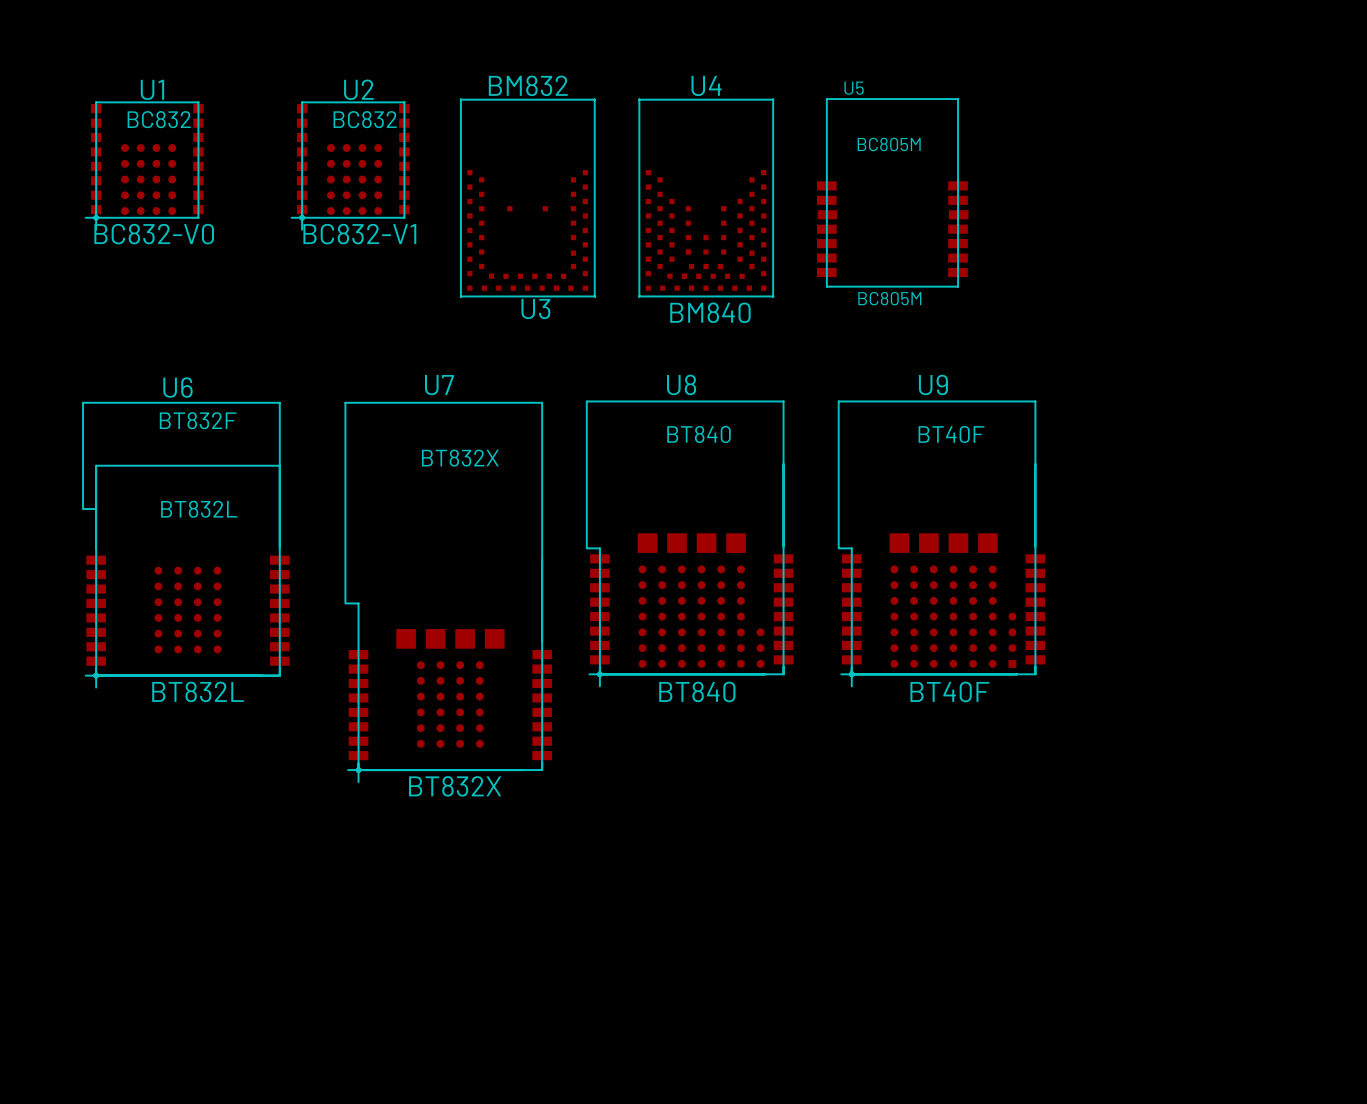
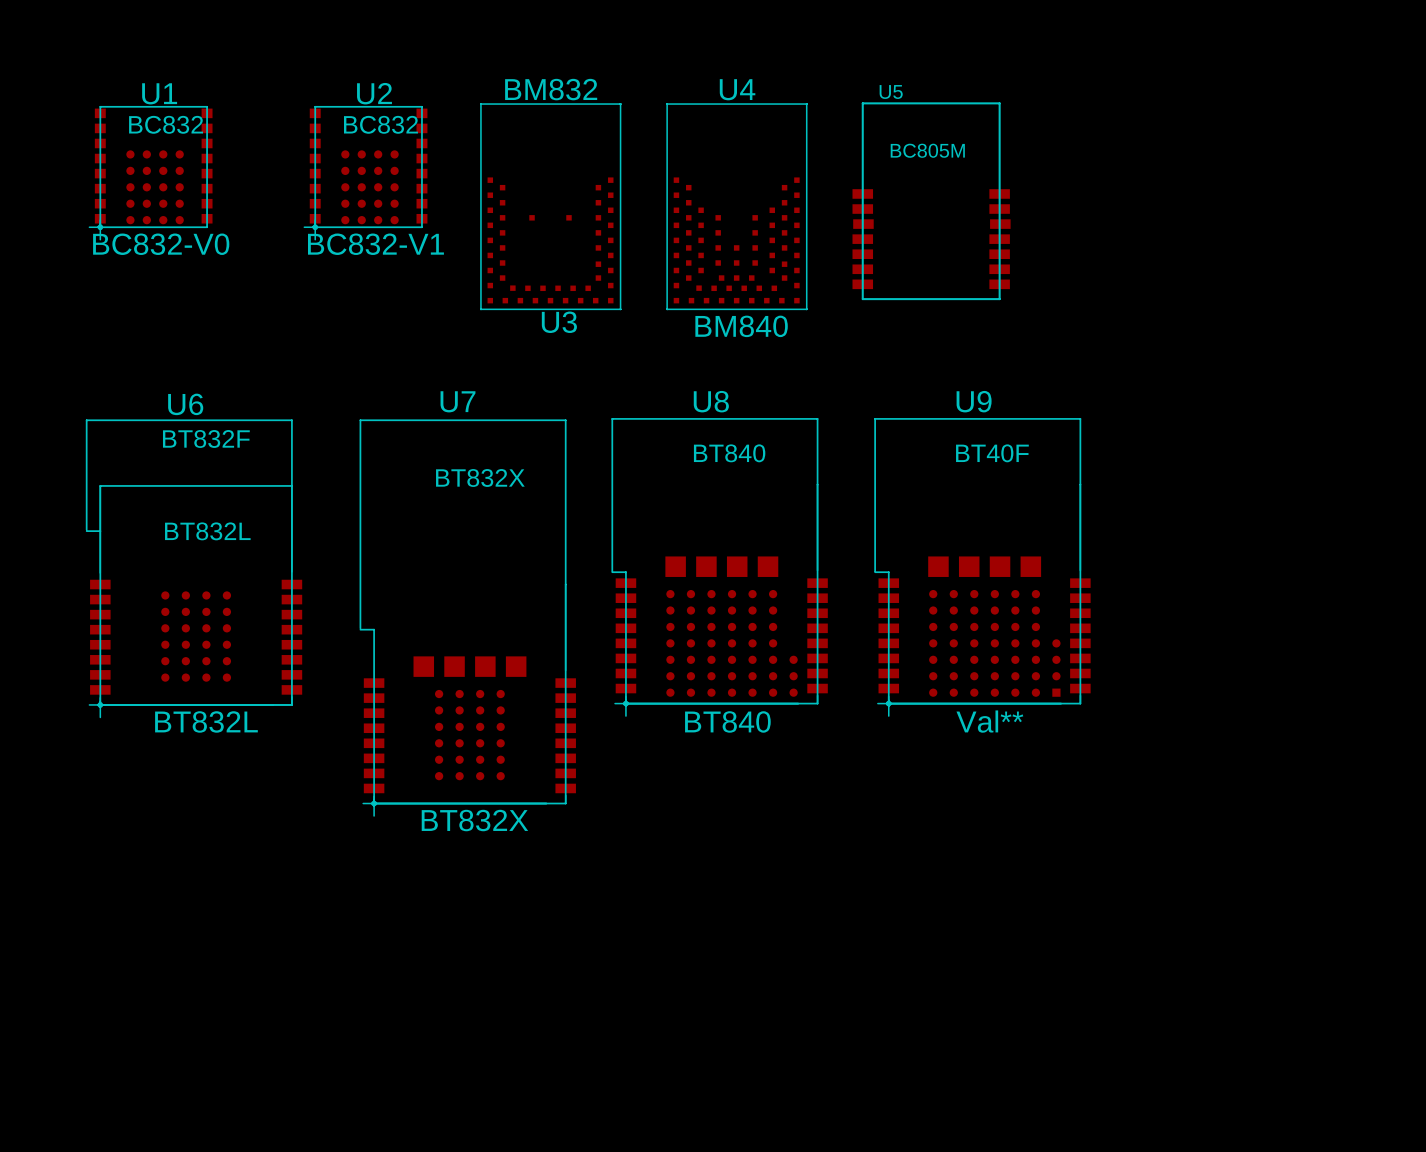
U5 value: BC805M (889, 298) -> none
U9 value: BT40F (949, 691) -> Val** (989, 721)

